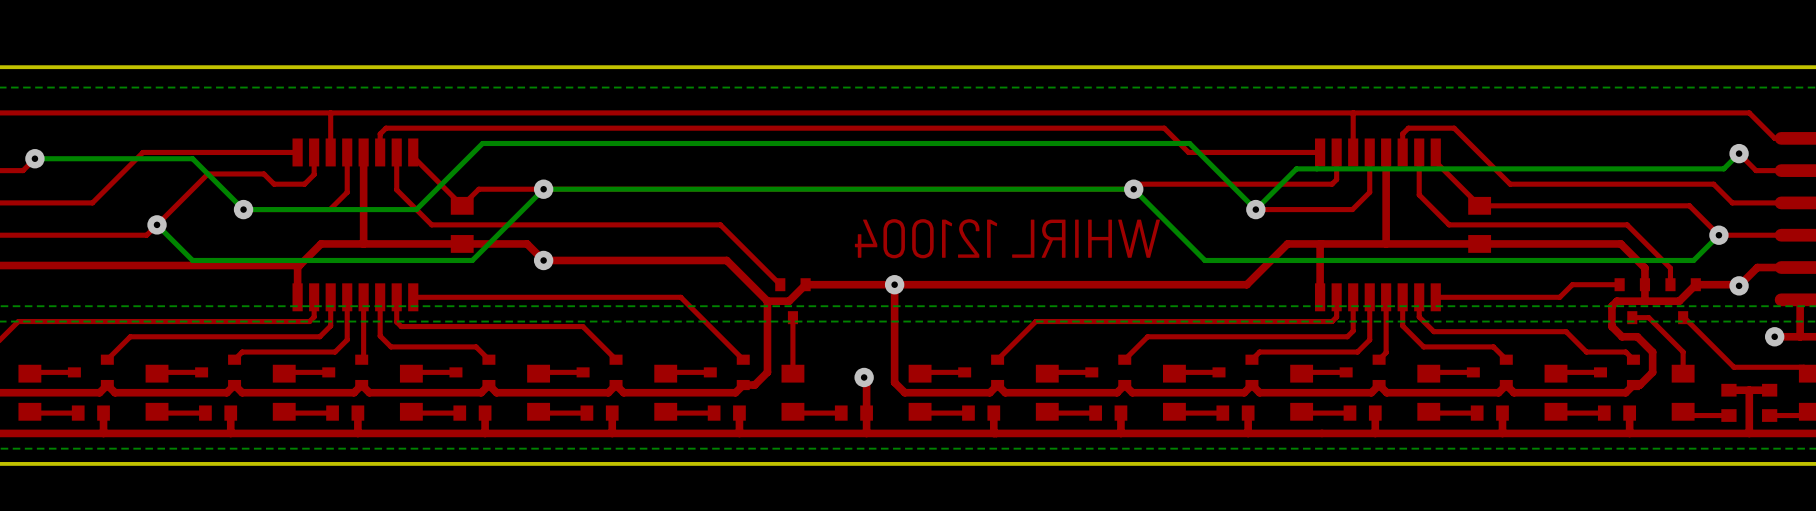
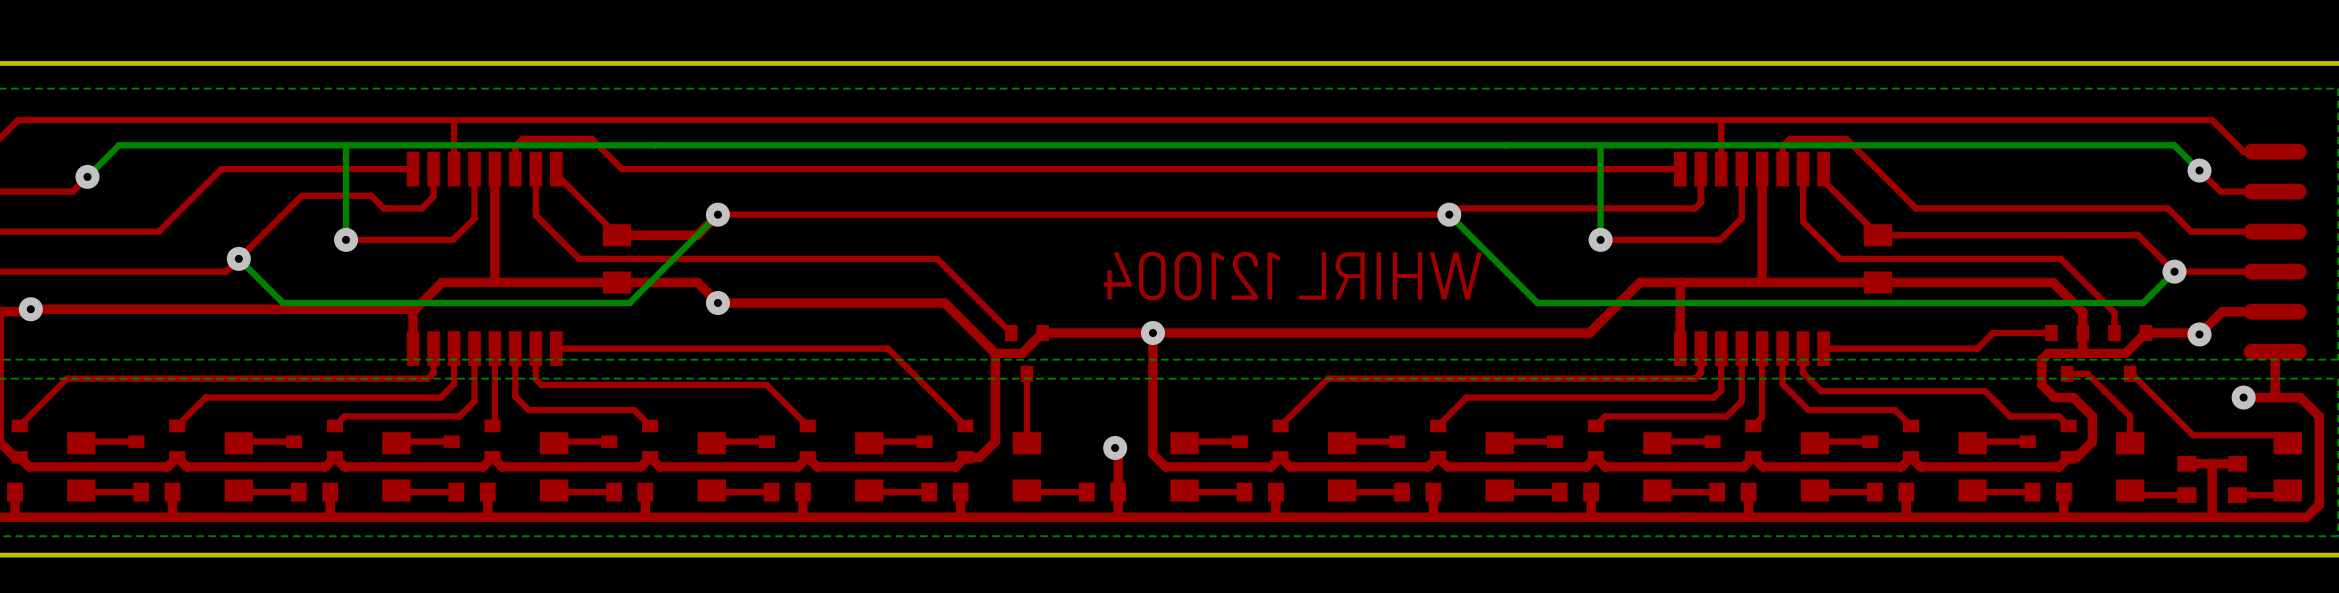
top track: (441, 128) (1164, 128) (1188, 152) -> (591, 139) (621, 169) (1517, 169)
bottom track: none -> (346, 145) (346, 239)
bottom track: none -> (1600, 145) (1600, 239)
bottom track: (1739, 153) (1723, 168) (1296, 168) (1255, 209) (1189, 143) (482, 143) (416, 209) (243, 209) (192, 158) (34, 158) -> (2199, 170) (2174, 145) (119, 145) (87, 176)
top track: (543, 189) (478, 189) (462, 205) -> (717, 214) (697, 235) (617, 235)
bottom track: (1133, 189) (543, 189) -> none

